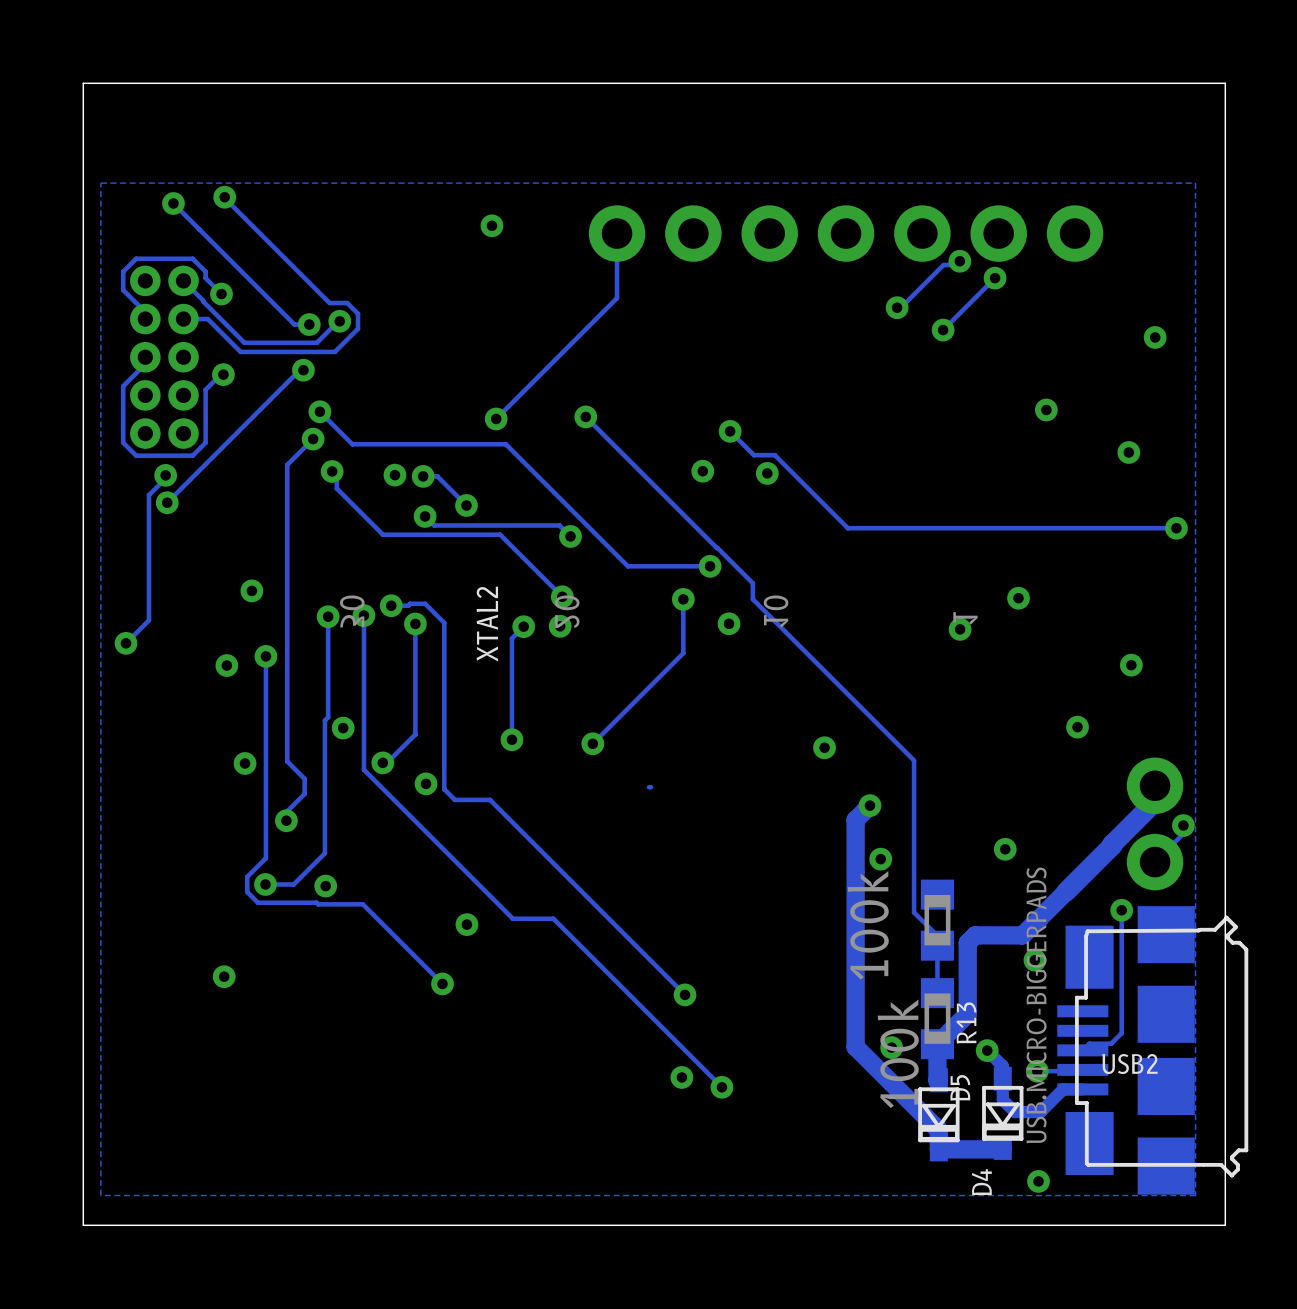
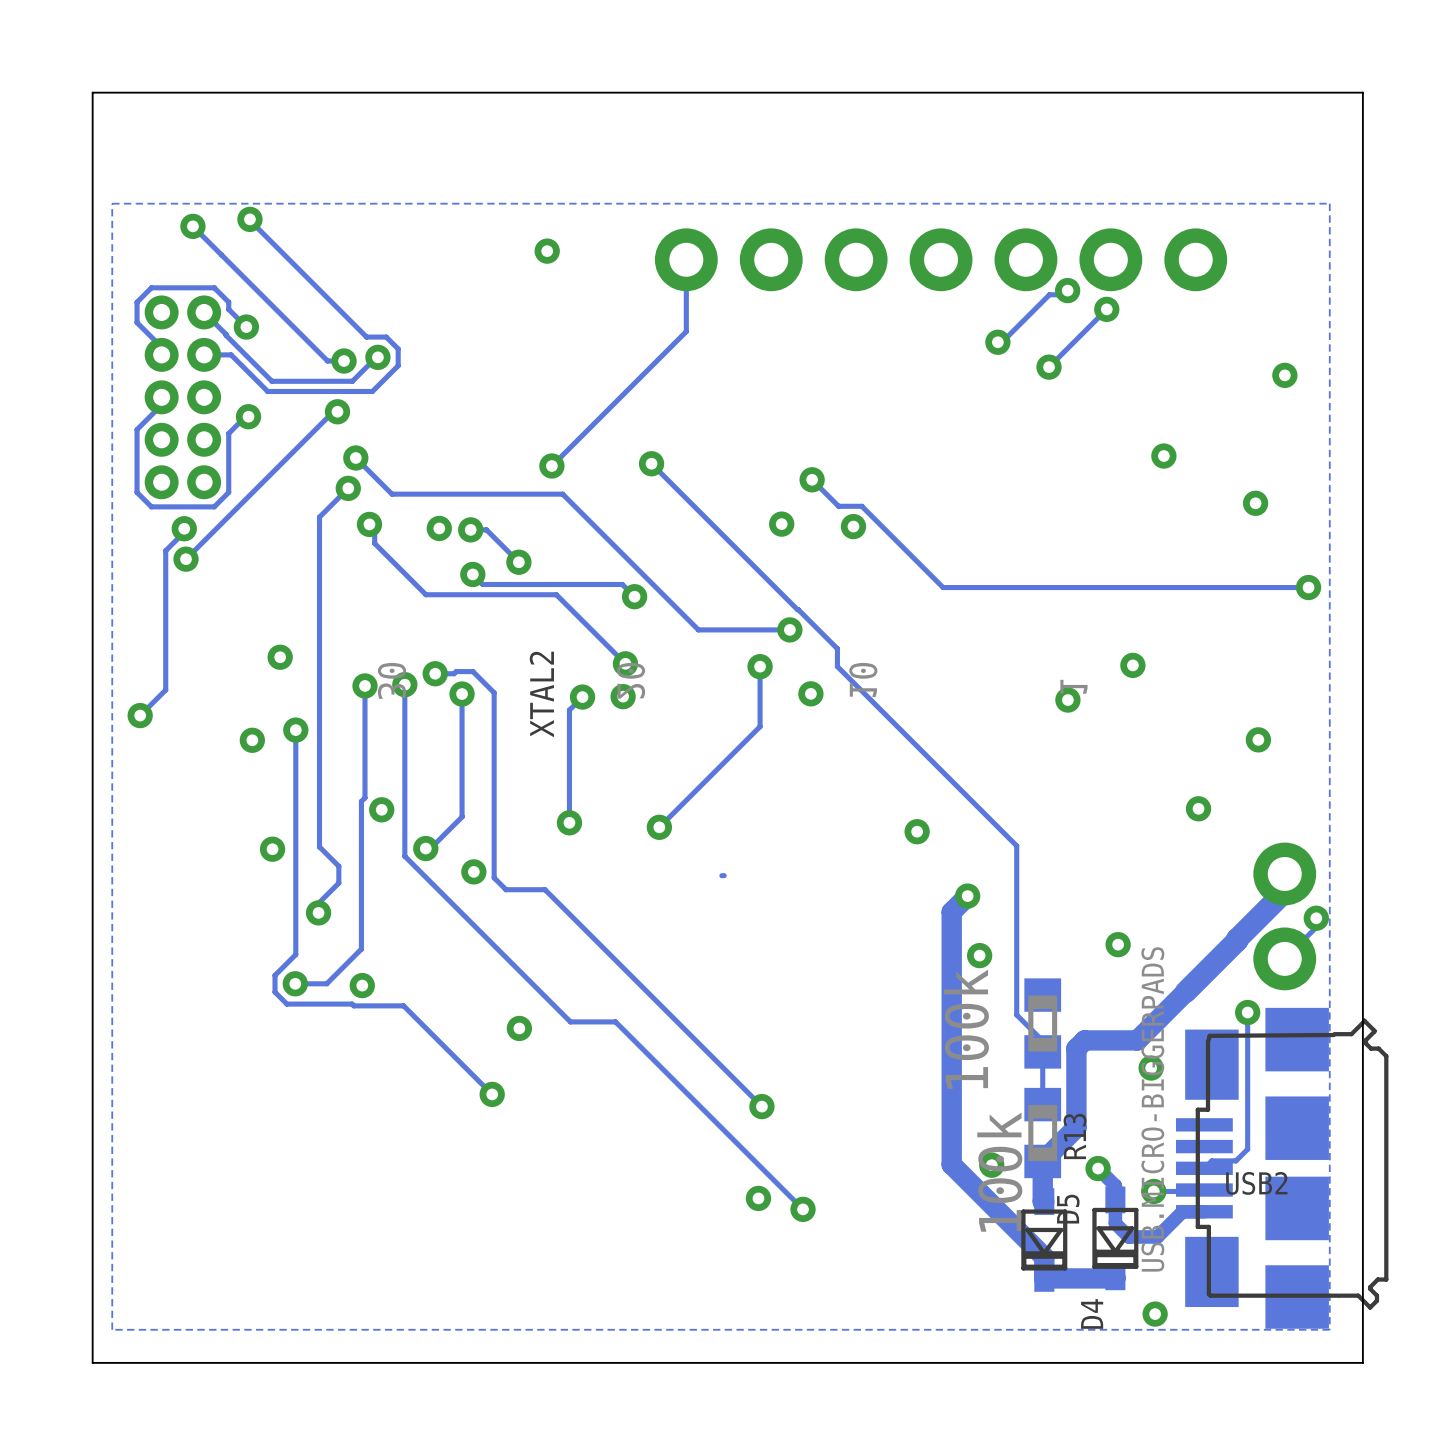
via: (224, 976) -> none

